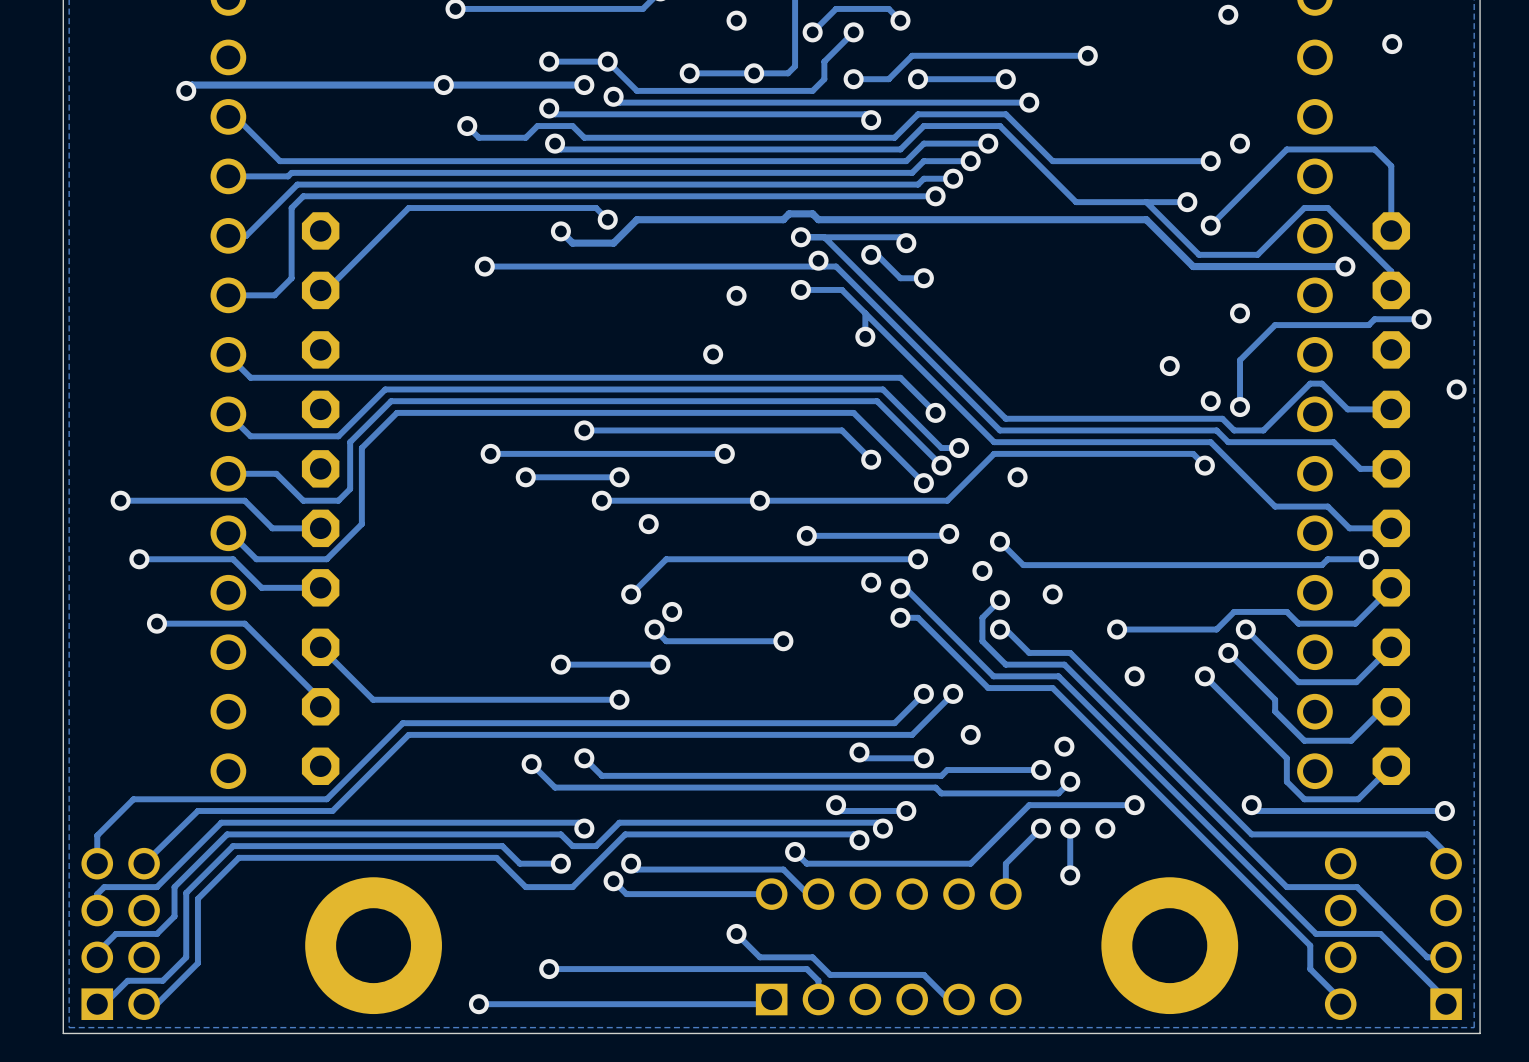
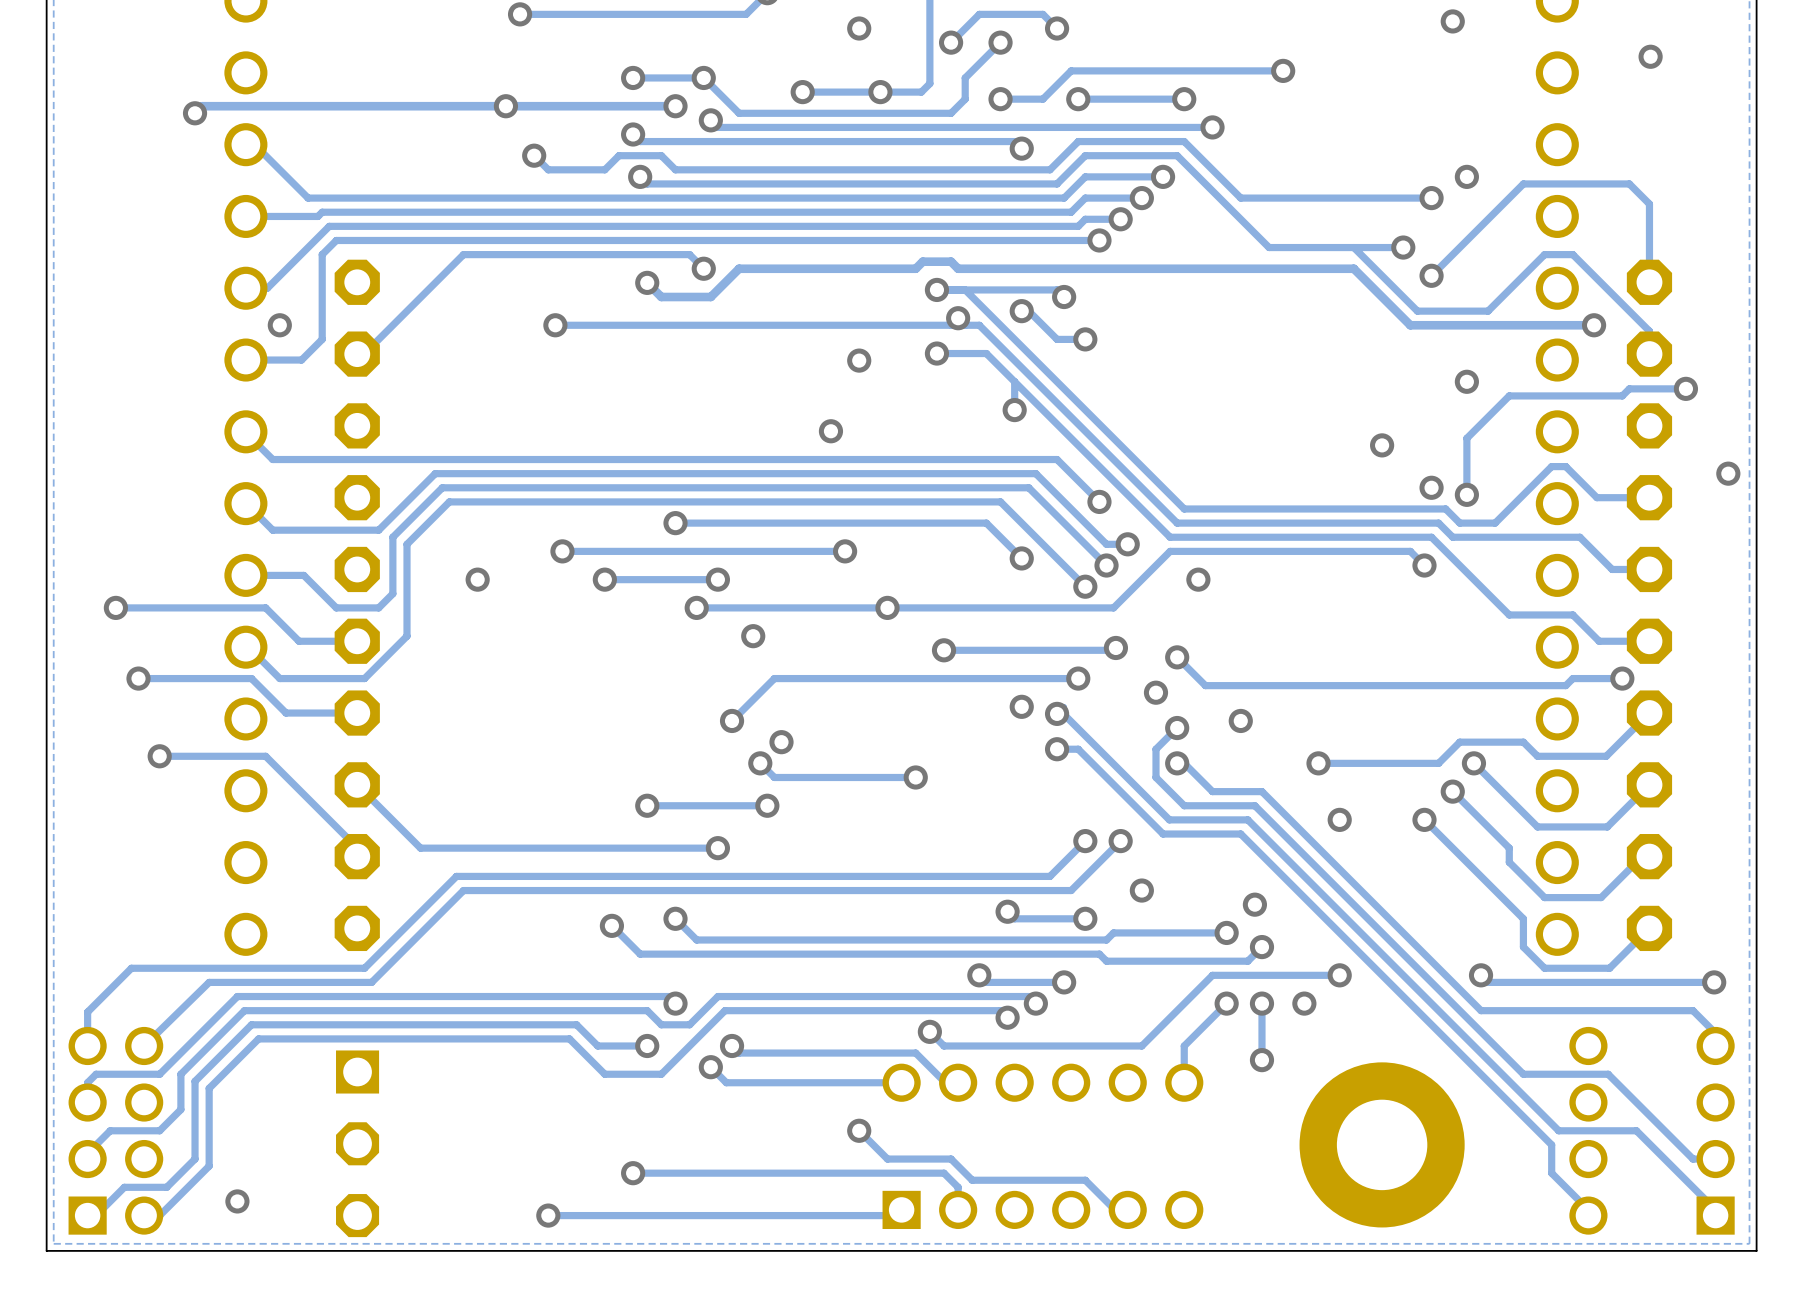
via: none -> (279, 325)
via: none -> (477, 579)
part: none -> (357, 1143)
part: (373, 945) -> none
via: none -> (237, 1201)

